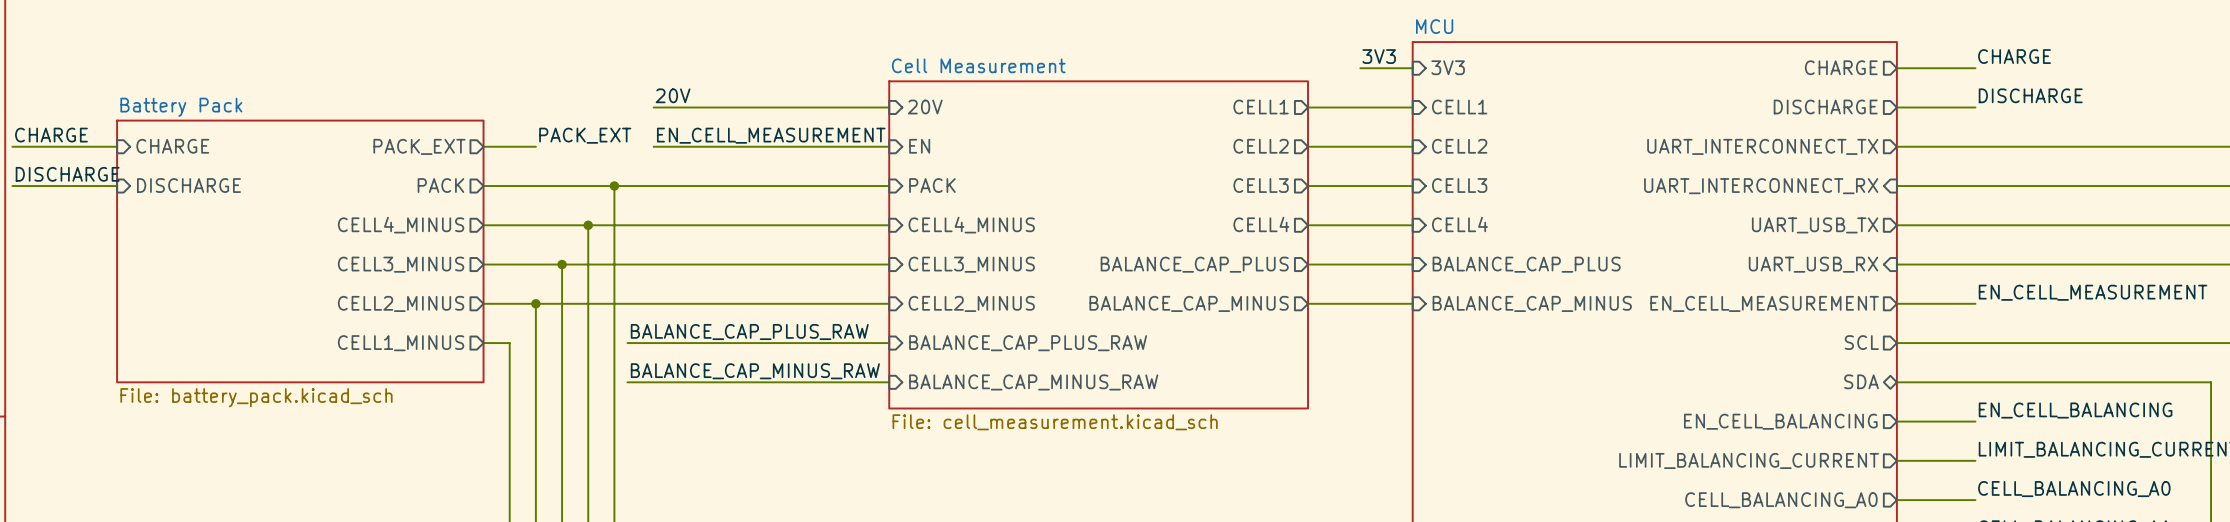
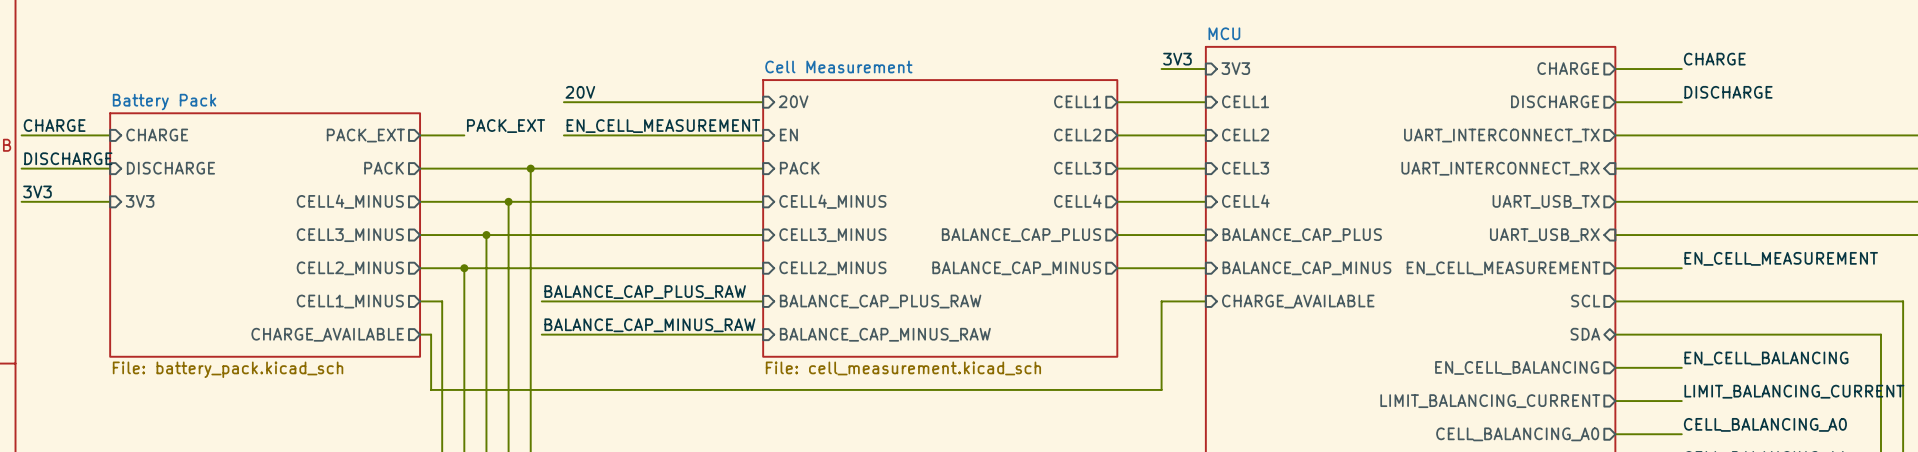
label: none -> 3V3 (37, 191)
sheet pin: none -> 3V3 (140, 201)
wire: none -> (21, 201) (110, 201)
sheet Battery Pack: File: battery_pack.kicad_sch (300, 251) -> none
sheet Battery Pack: none -> File: battery_pack.kicad_sch (265, 235)
wire: none -> (1205, 301) (1161, 301) (1161, 389) (431, 389) (431, 334) (420, 334)
sheet pin: none -> CHARGE_AVAILABLE (1298, 301)
sheet pin: none -> CHARGE_AVAILABLE (327, 334)

